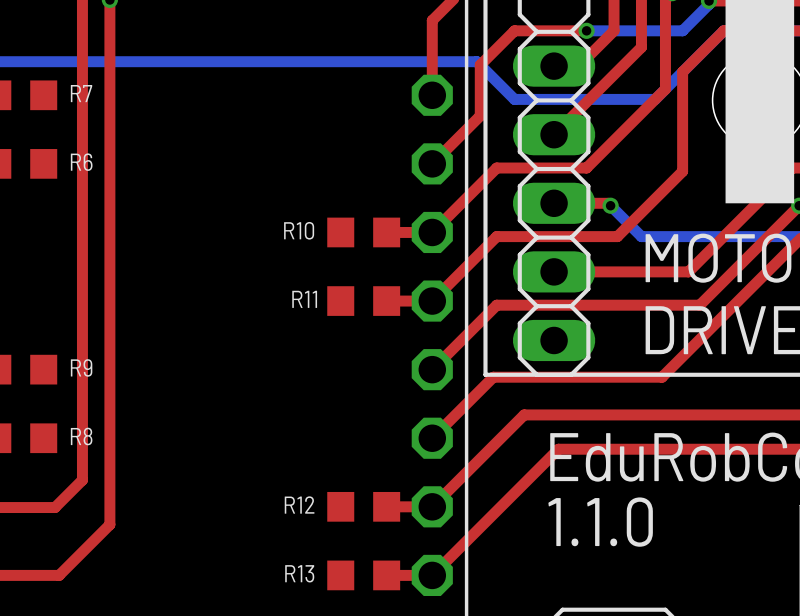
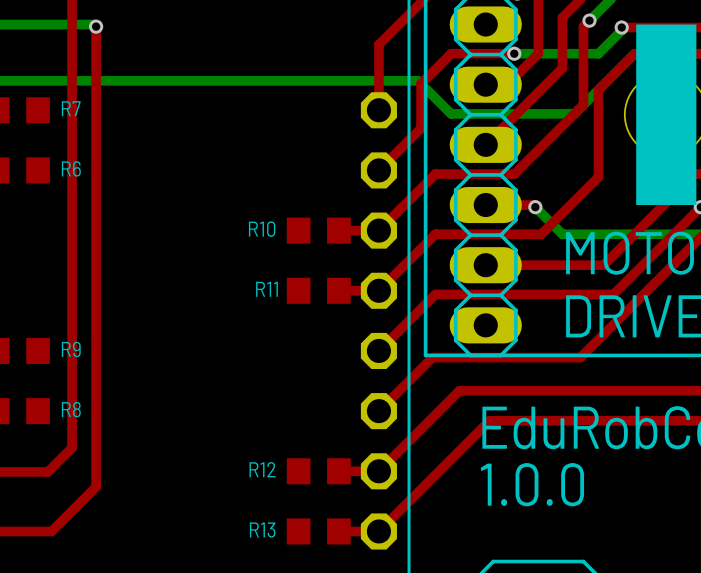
text: 1.1.0 (600, 522) -> 1.0.0 (532, 484)

